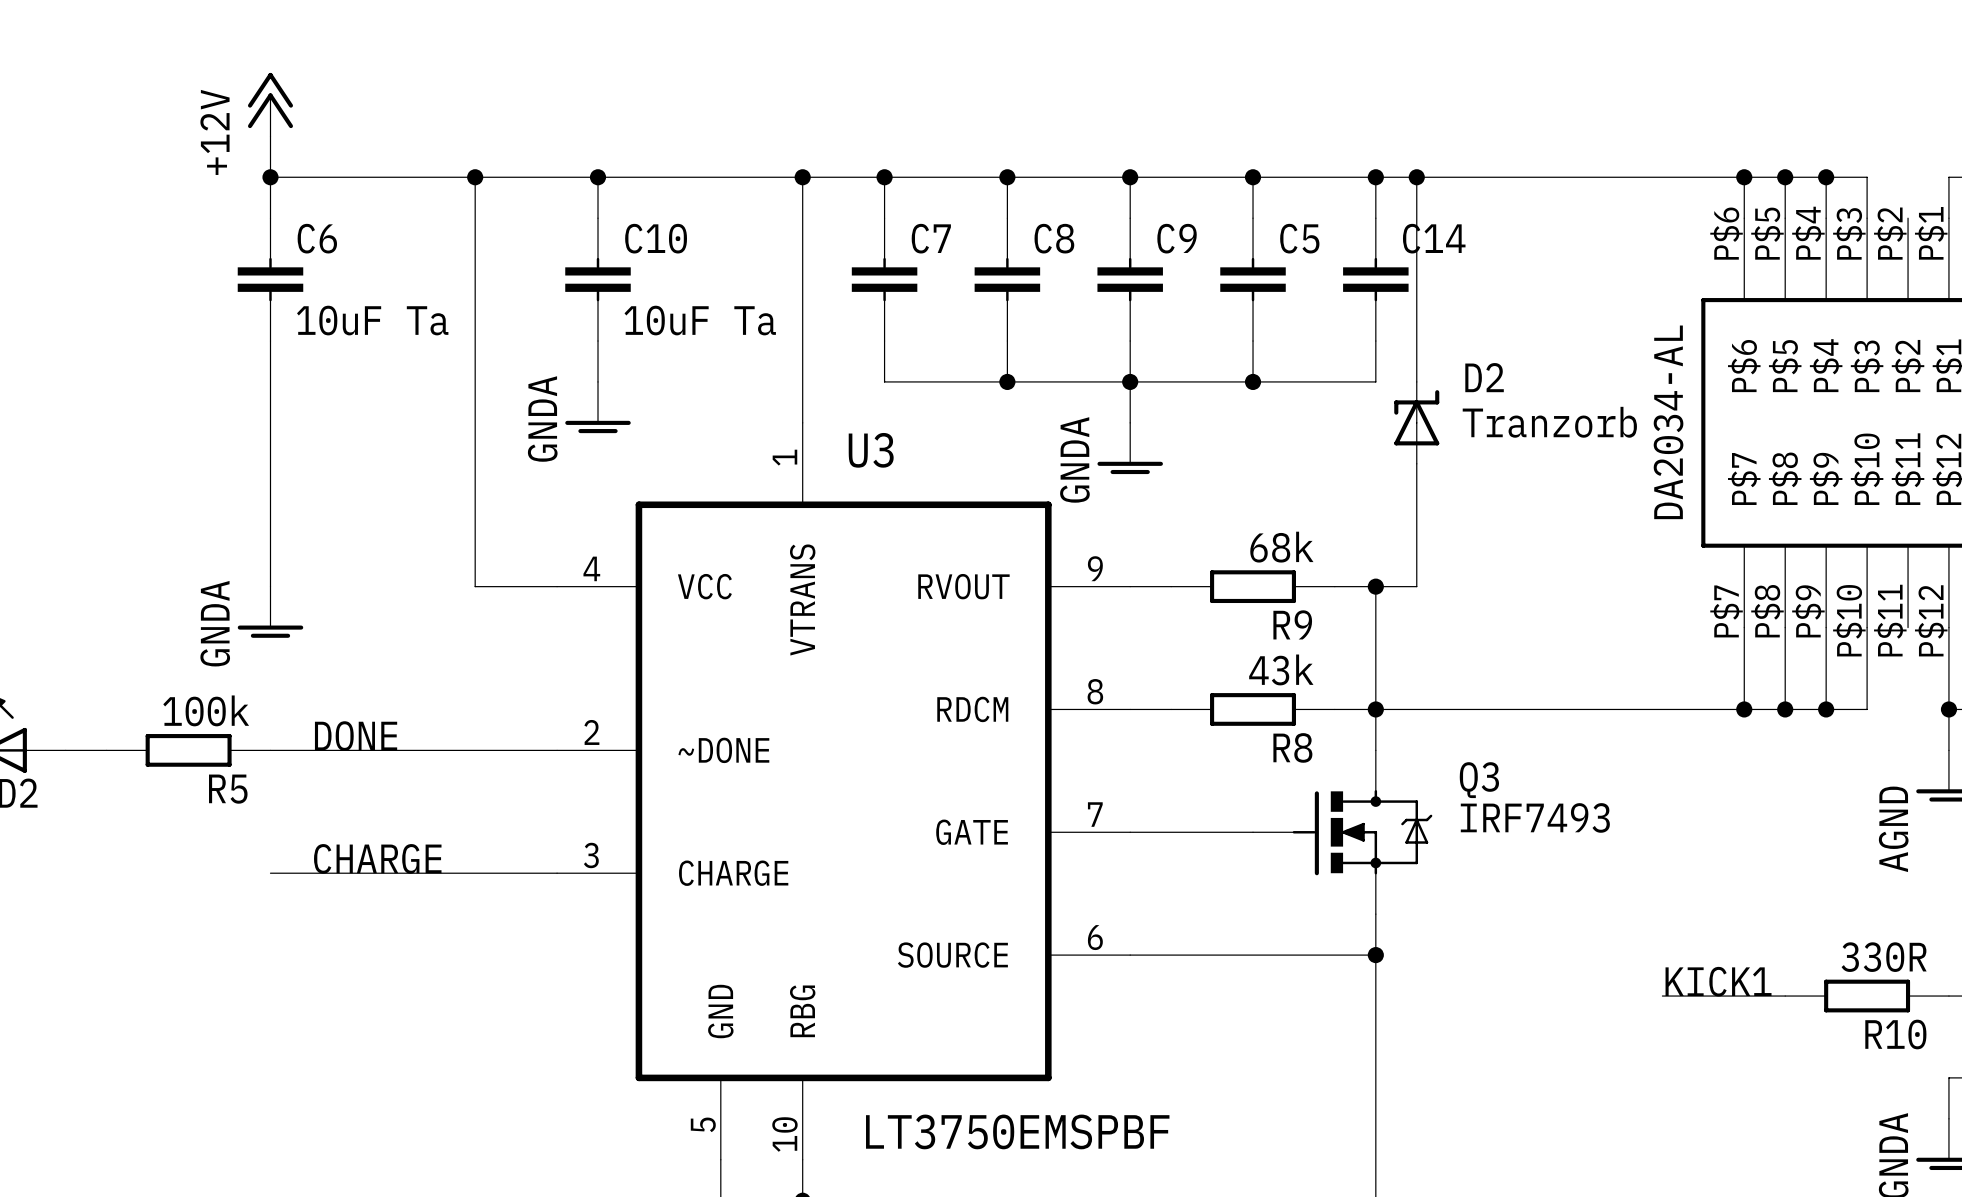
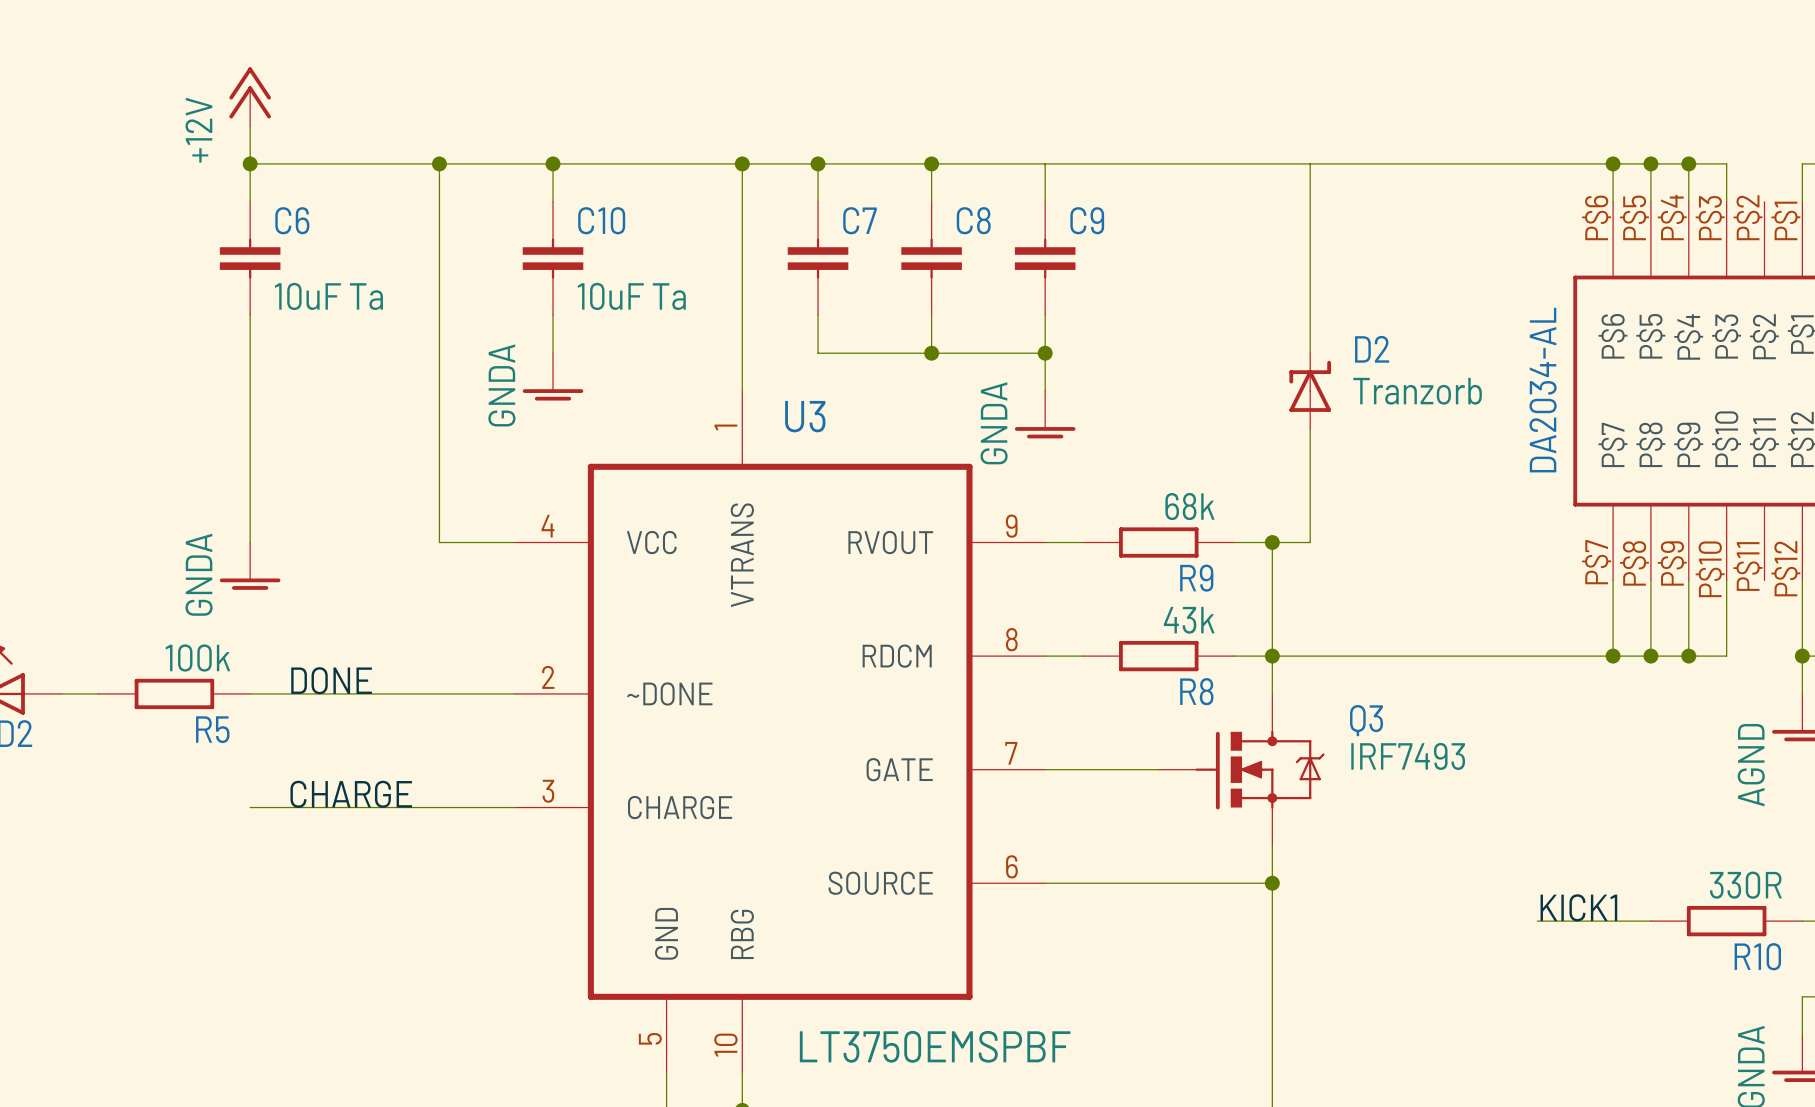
junction: (1130, 177) -> none
wire: (1253, 177) (1253, 218) -> none
junction: (1253, 177) -> none
wire: (1375, 177) (1375, 218) -> none
junction: (1375, 177) -> none
junction: (1416, 177) -> none
C5: (1253, 279) -> none
C14: (1375, 279) -> none
wire: (1253, 341) (1253, 381) -> none
wire: (1375, 341) (1375, 381) (1130, 381) -> none
junction: (1253, 381) -> none

